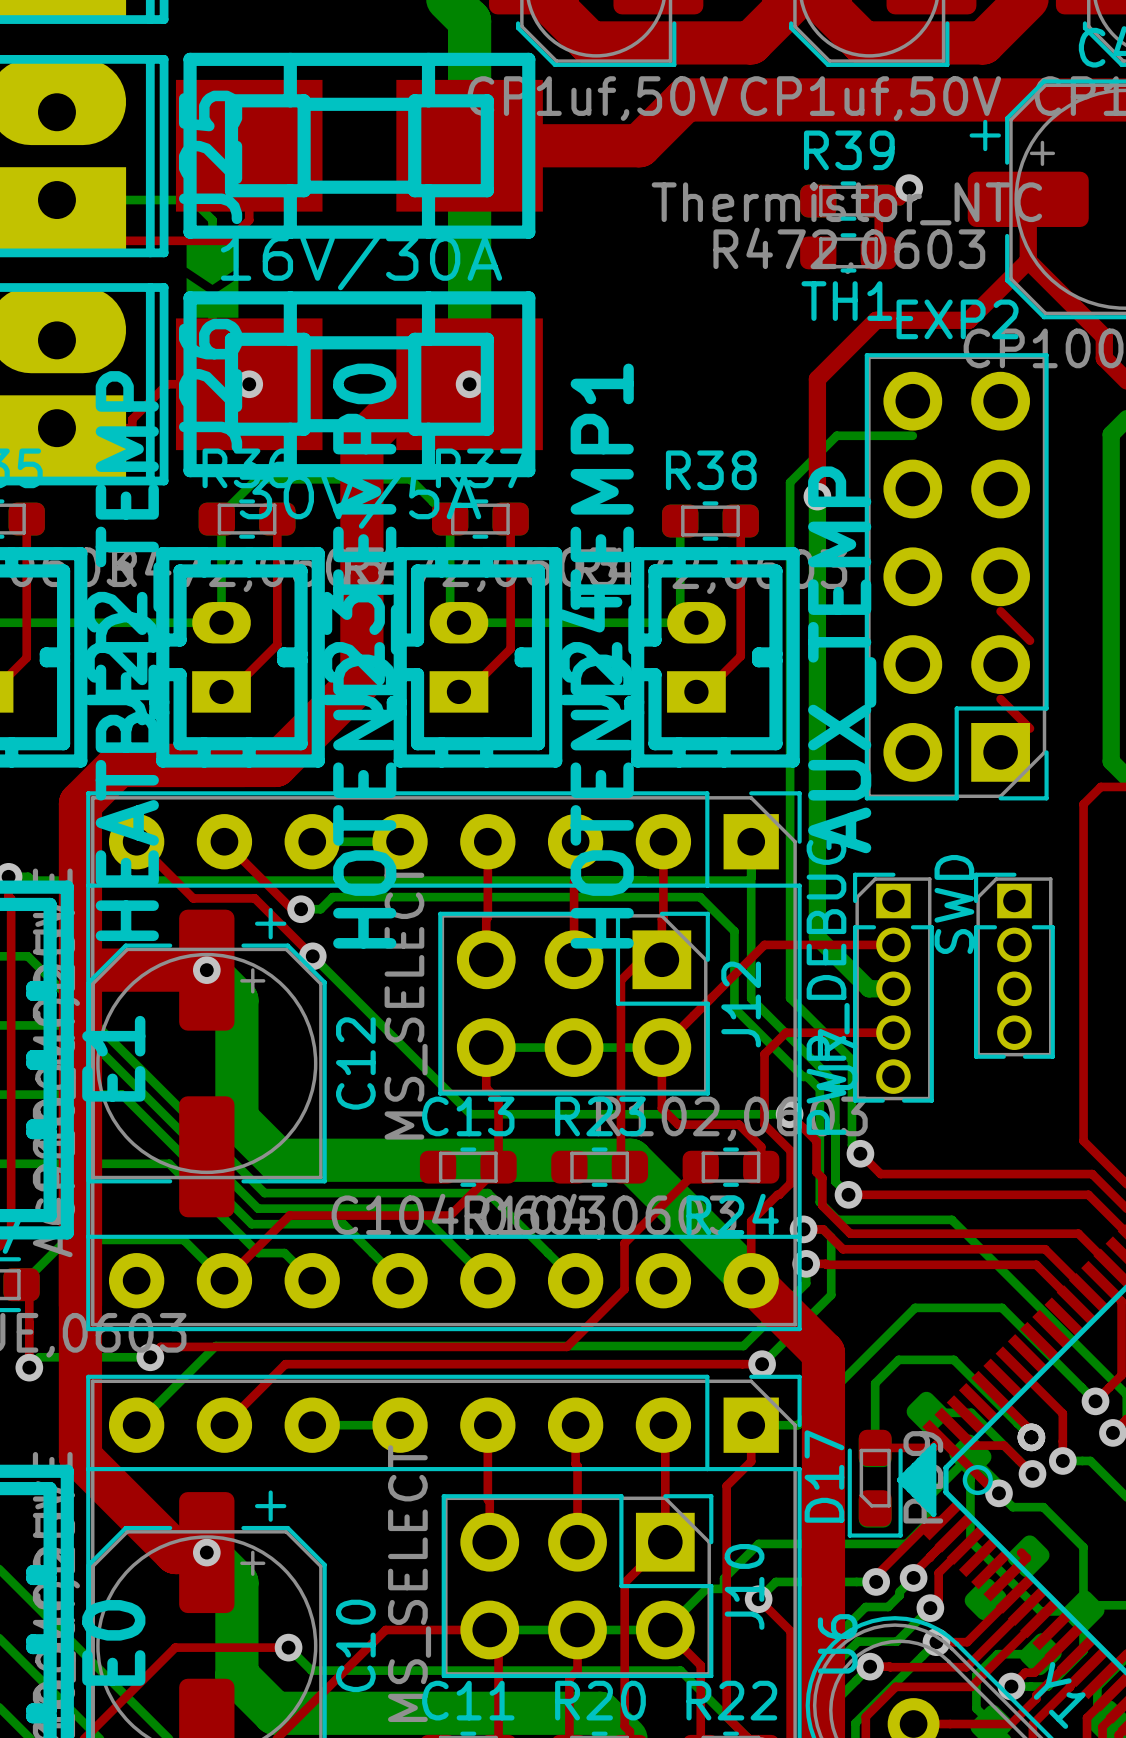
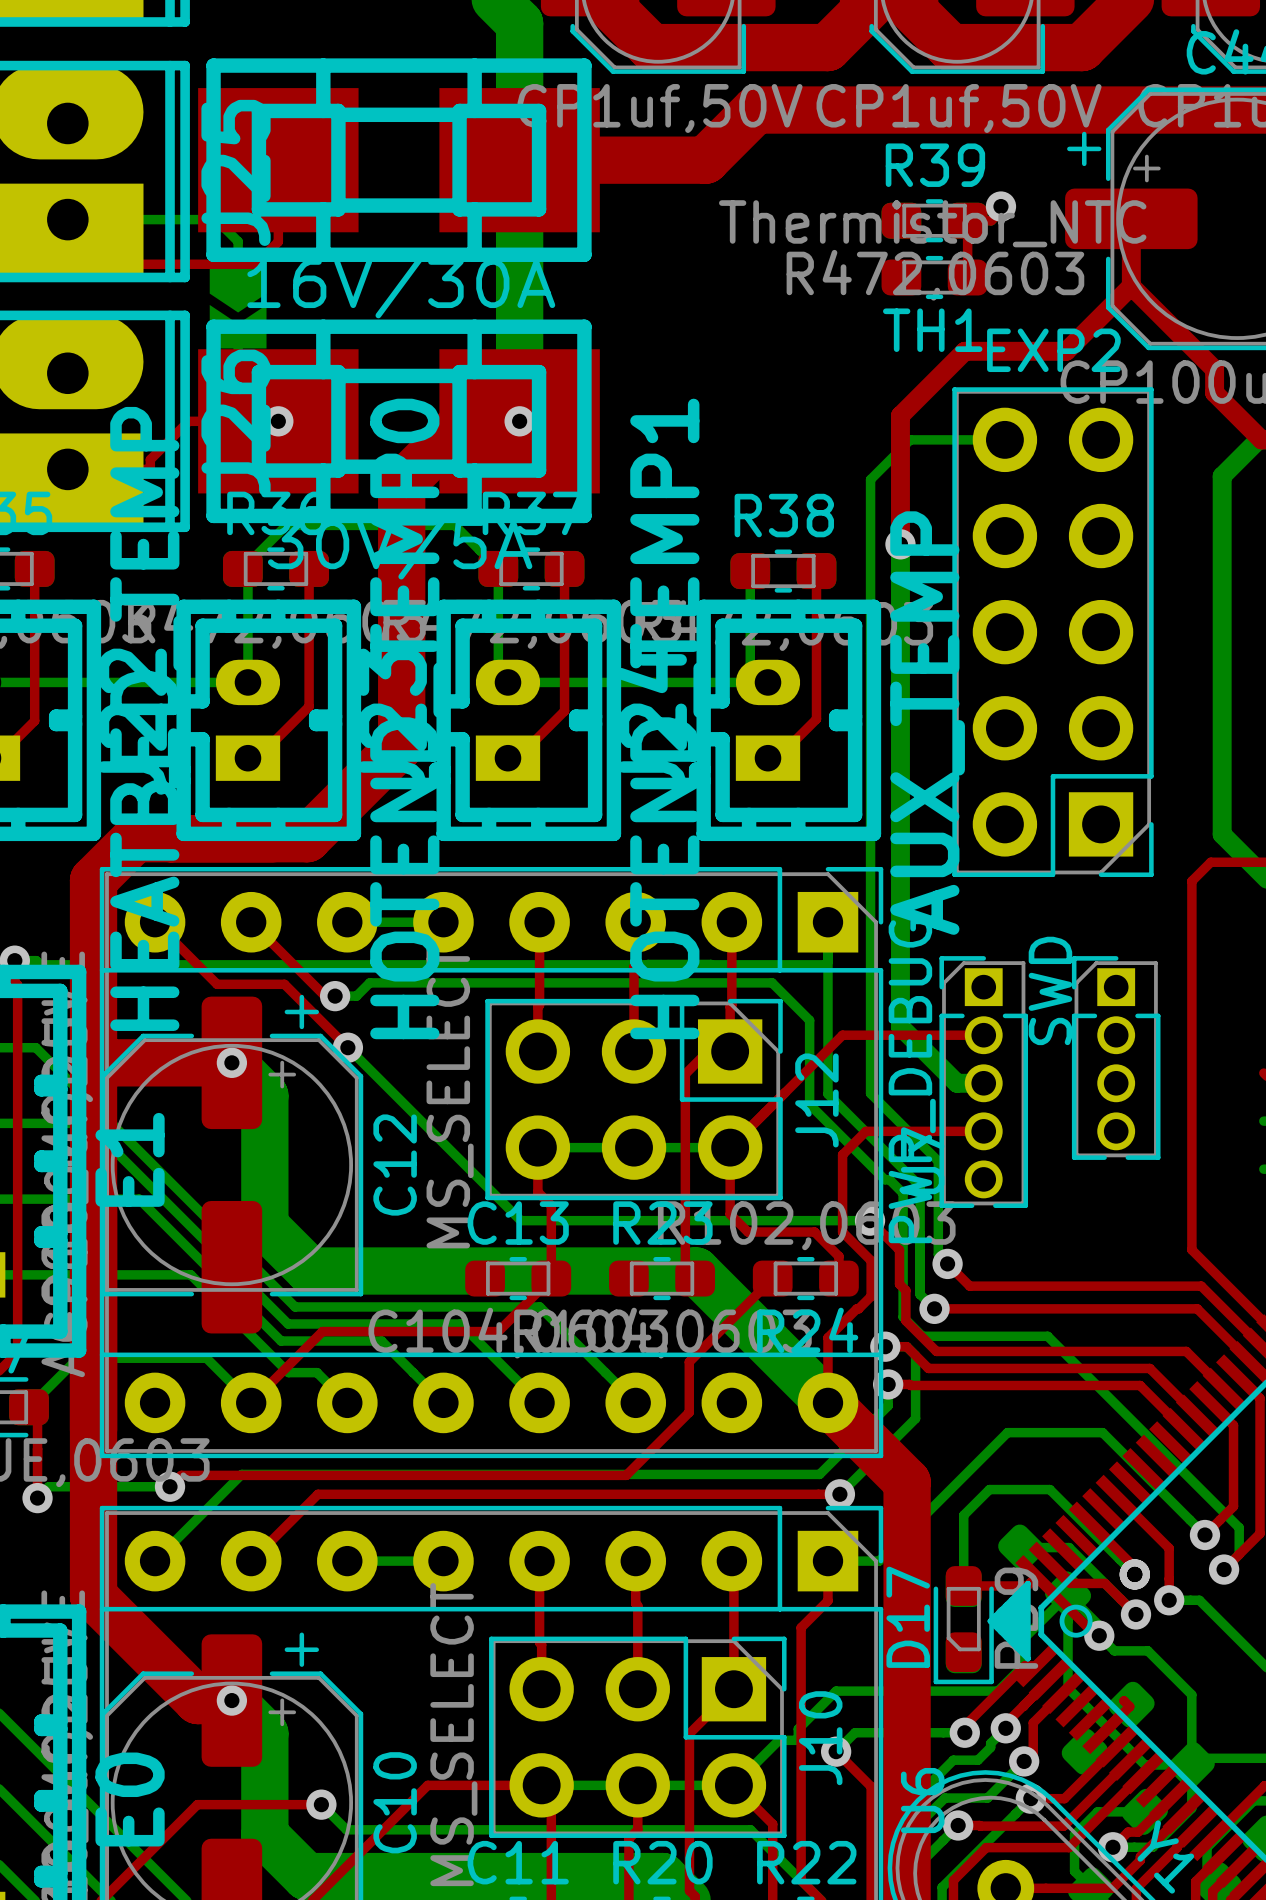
bottom track: (912, 435) (836, 435) (790, 482) -> (1004, 439) (910, 439) (870, 479) (870, 528)
top track: (1000, 611) (1029, 640) -> none
top track: (1000, 699) (1029, 728) -> none

